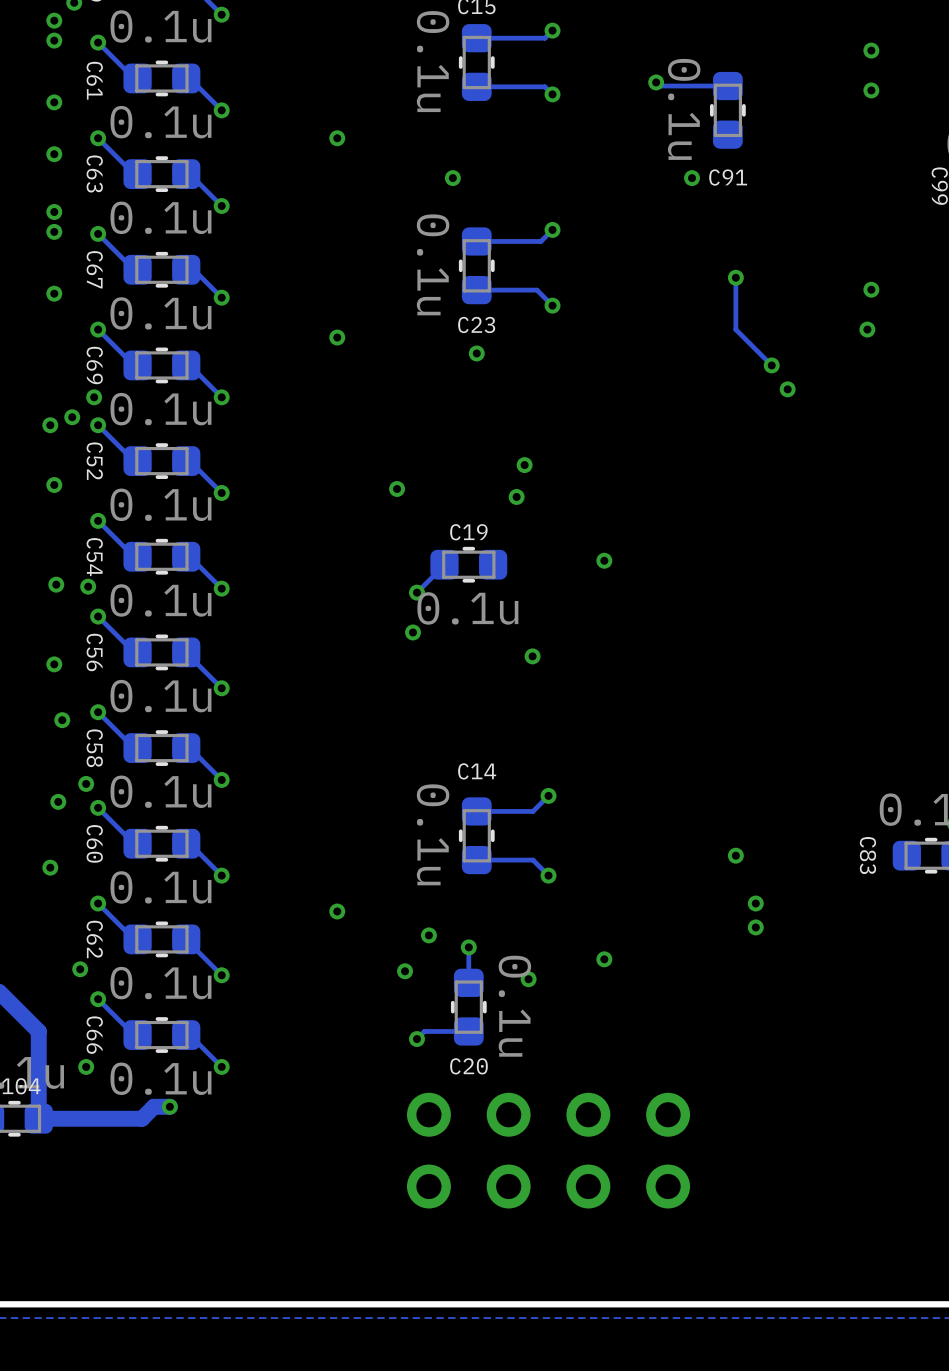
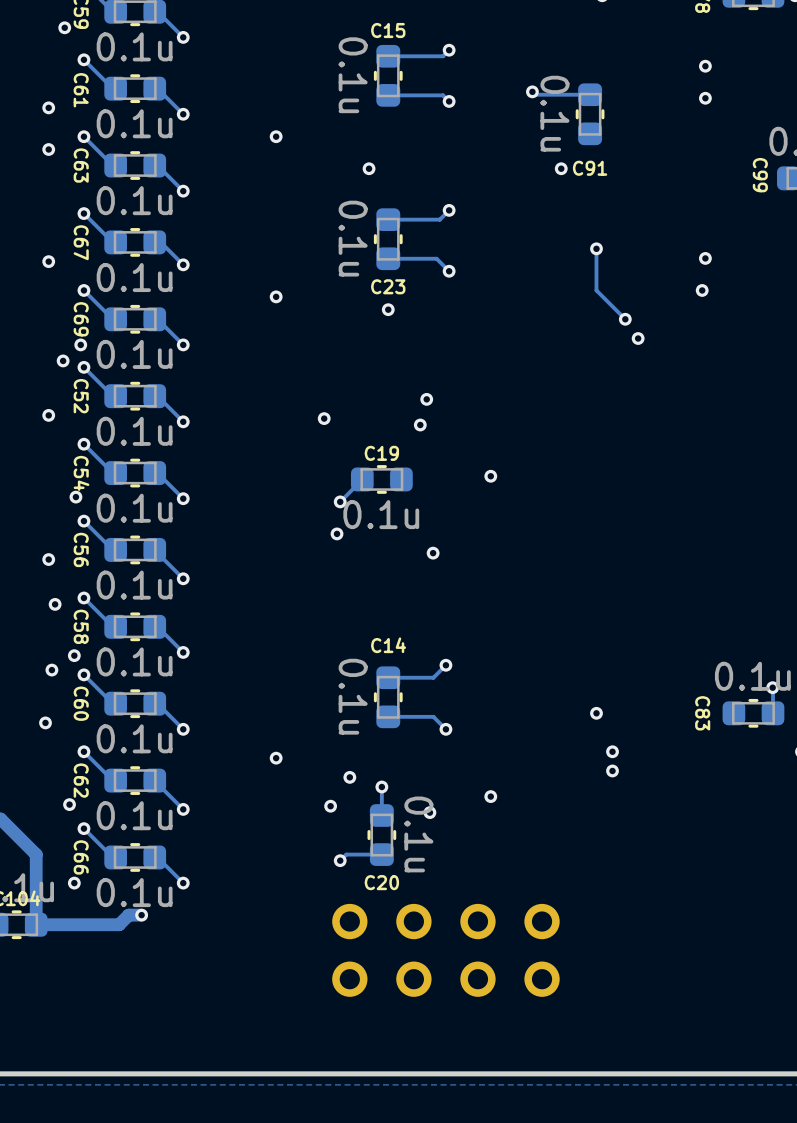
via: (54, 20) -> none
via: (54, 40) -> none
via: (54, 211) -> none
via: (54, 231) -> none
via: (50, 425) -> none
via: (56, 584) -> none

